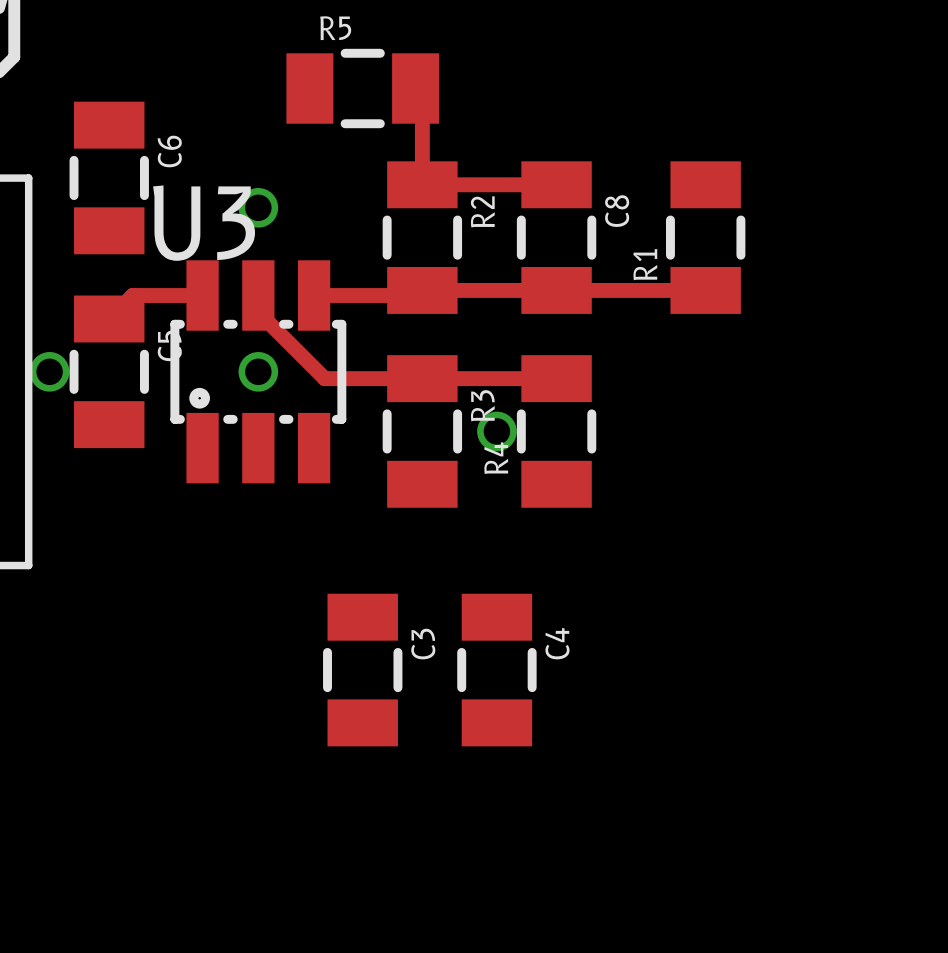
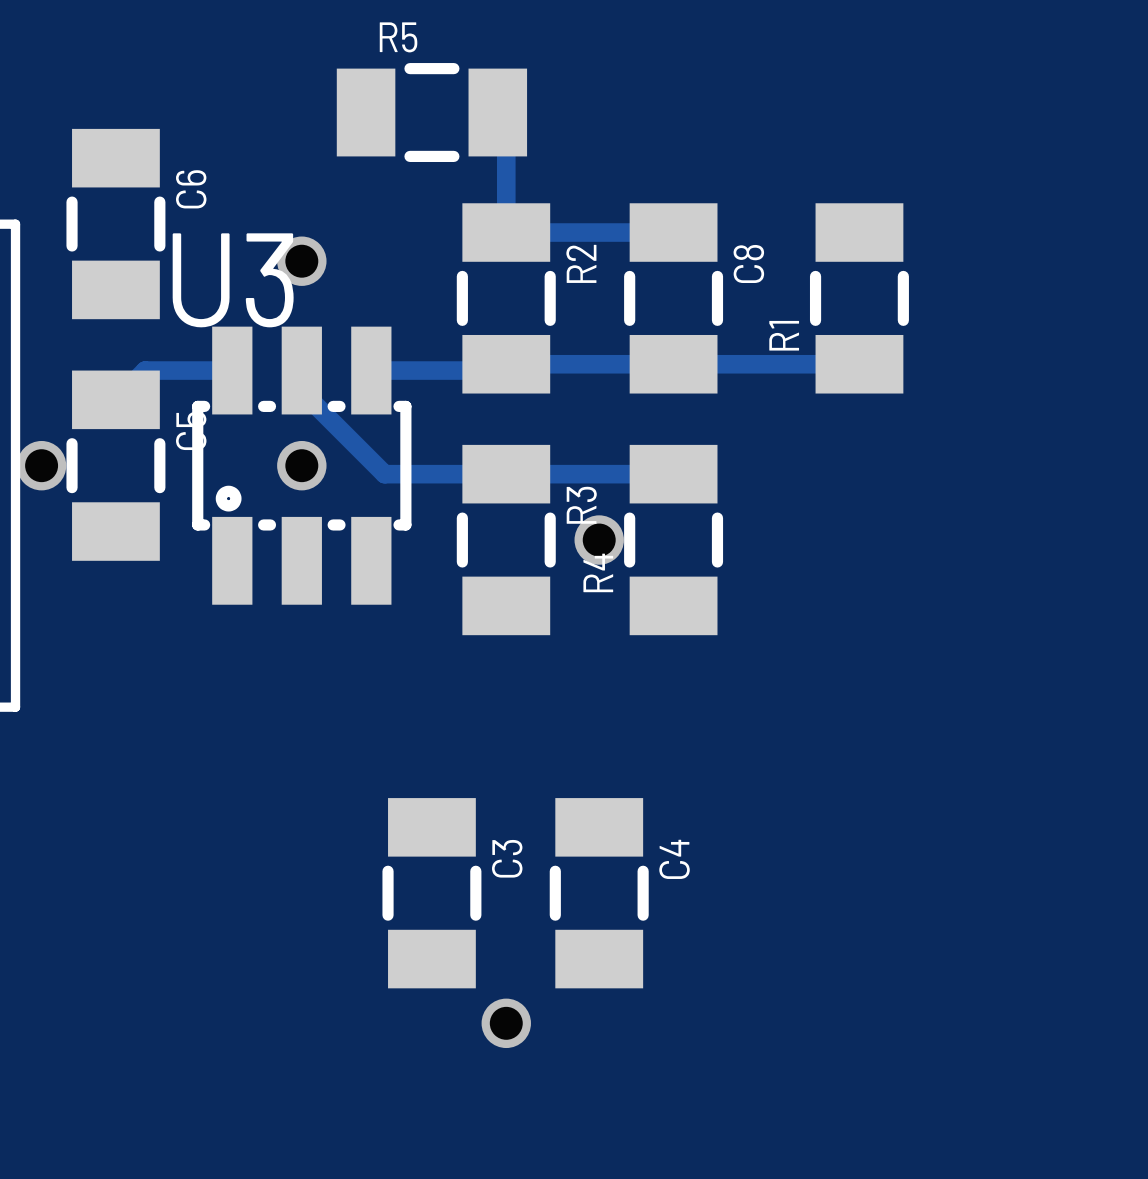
C3 position: (362, 670) -> (431, 893)
C4 position: (496, 670) -> (599, 893)
via: none -> (506, 1023)

